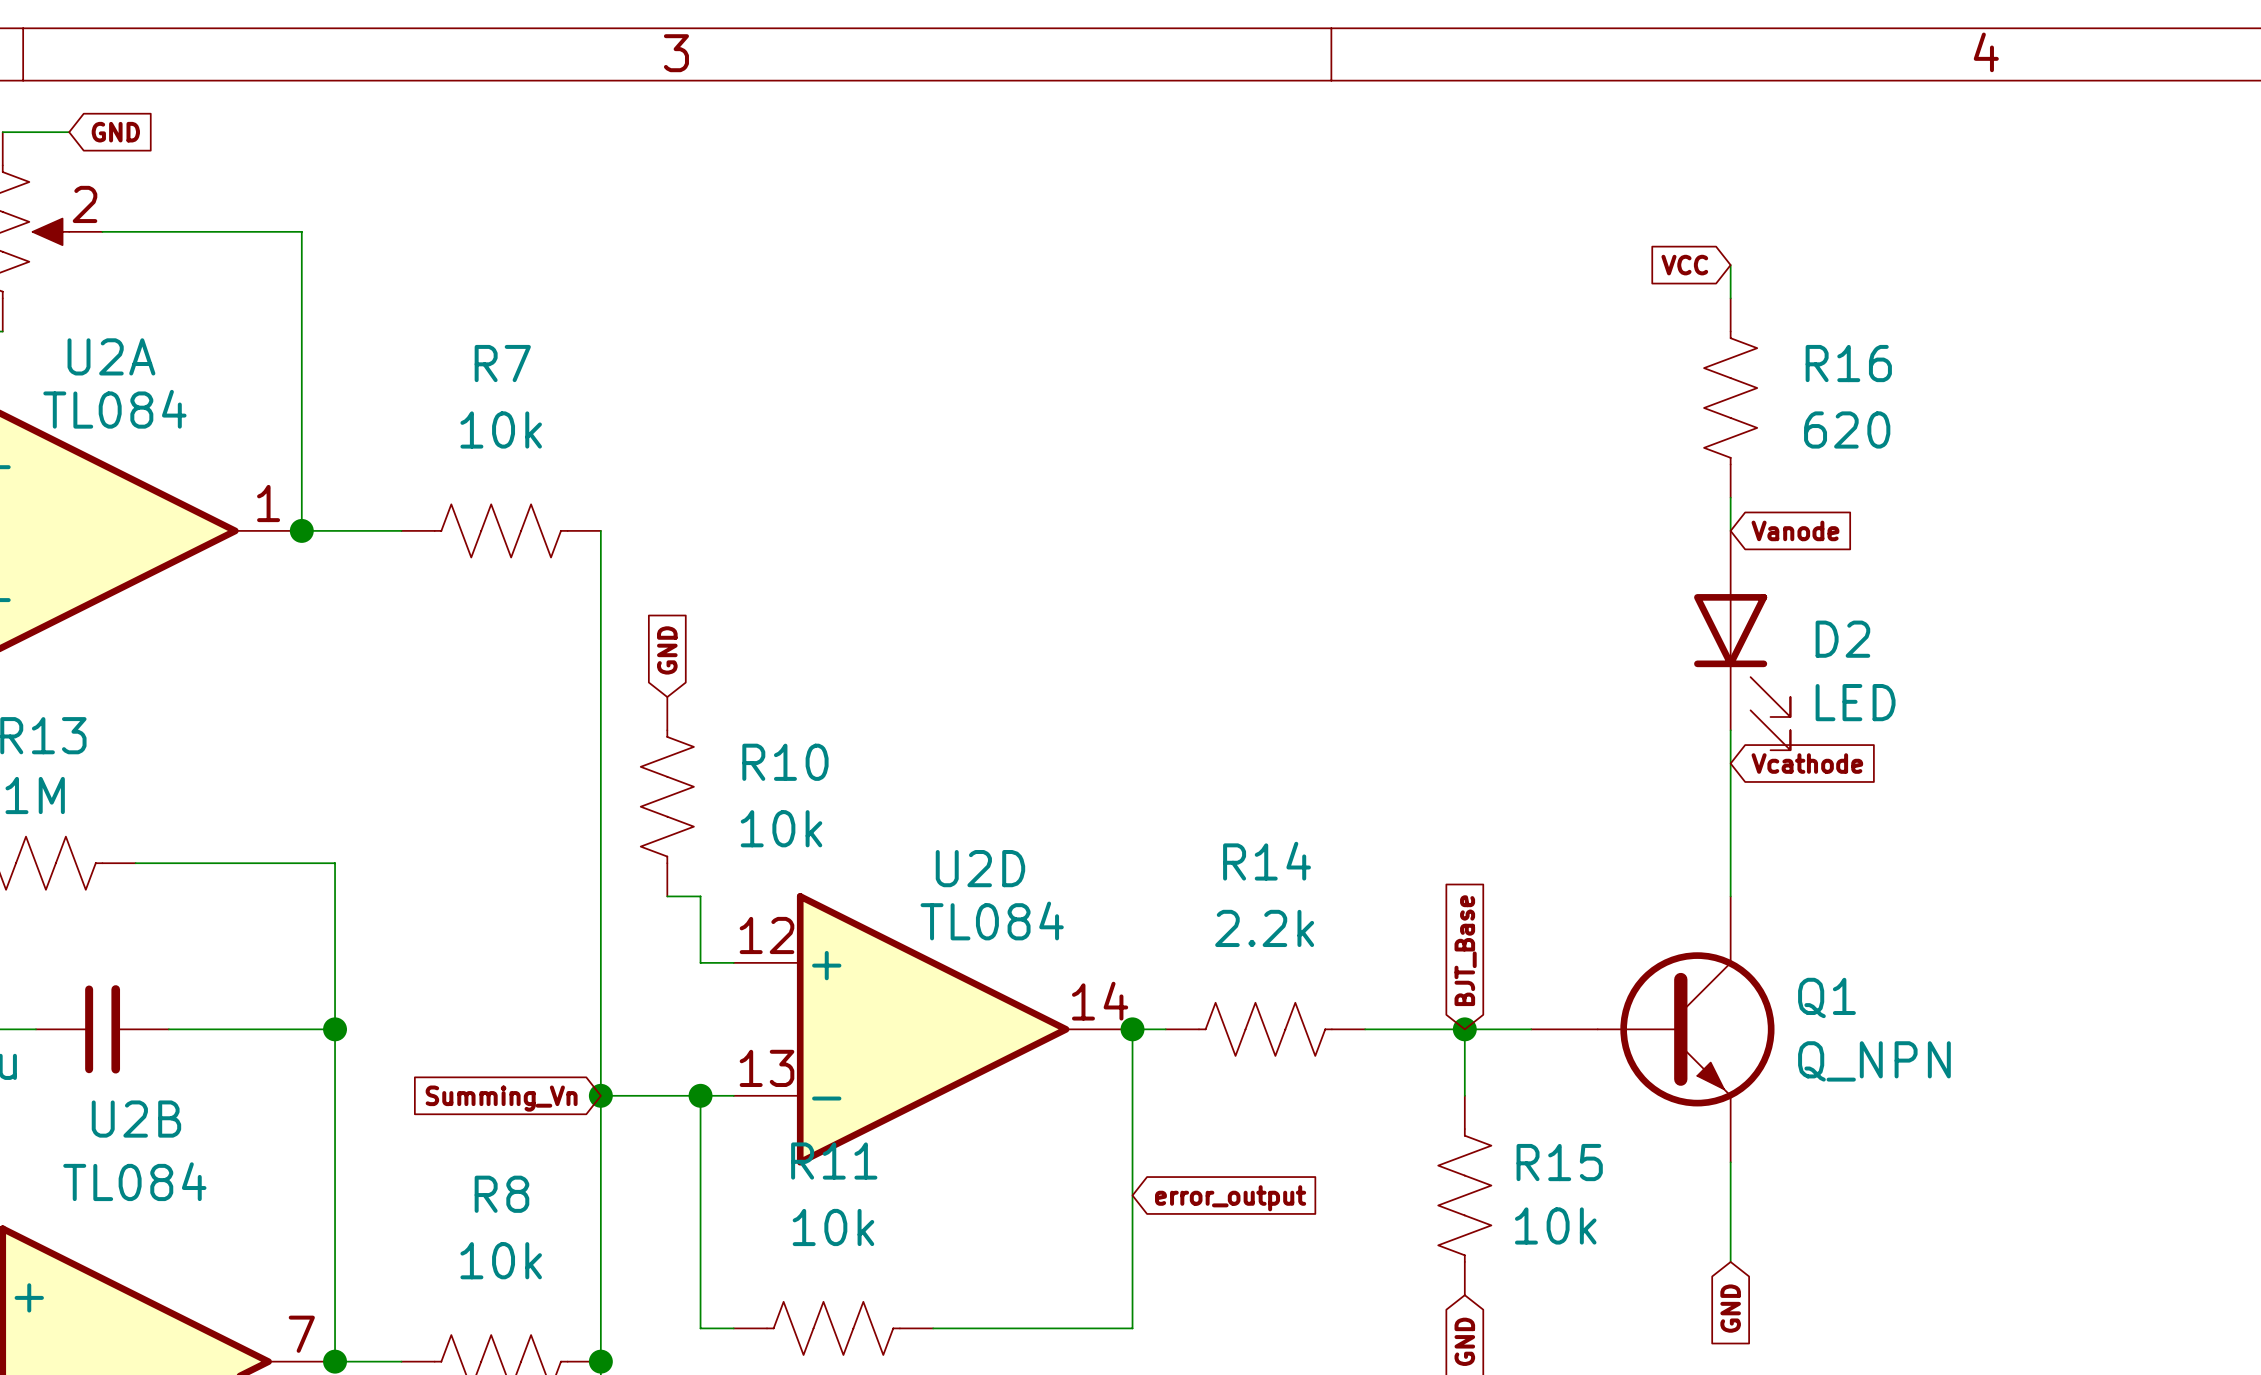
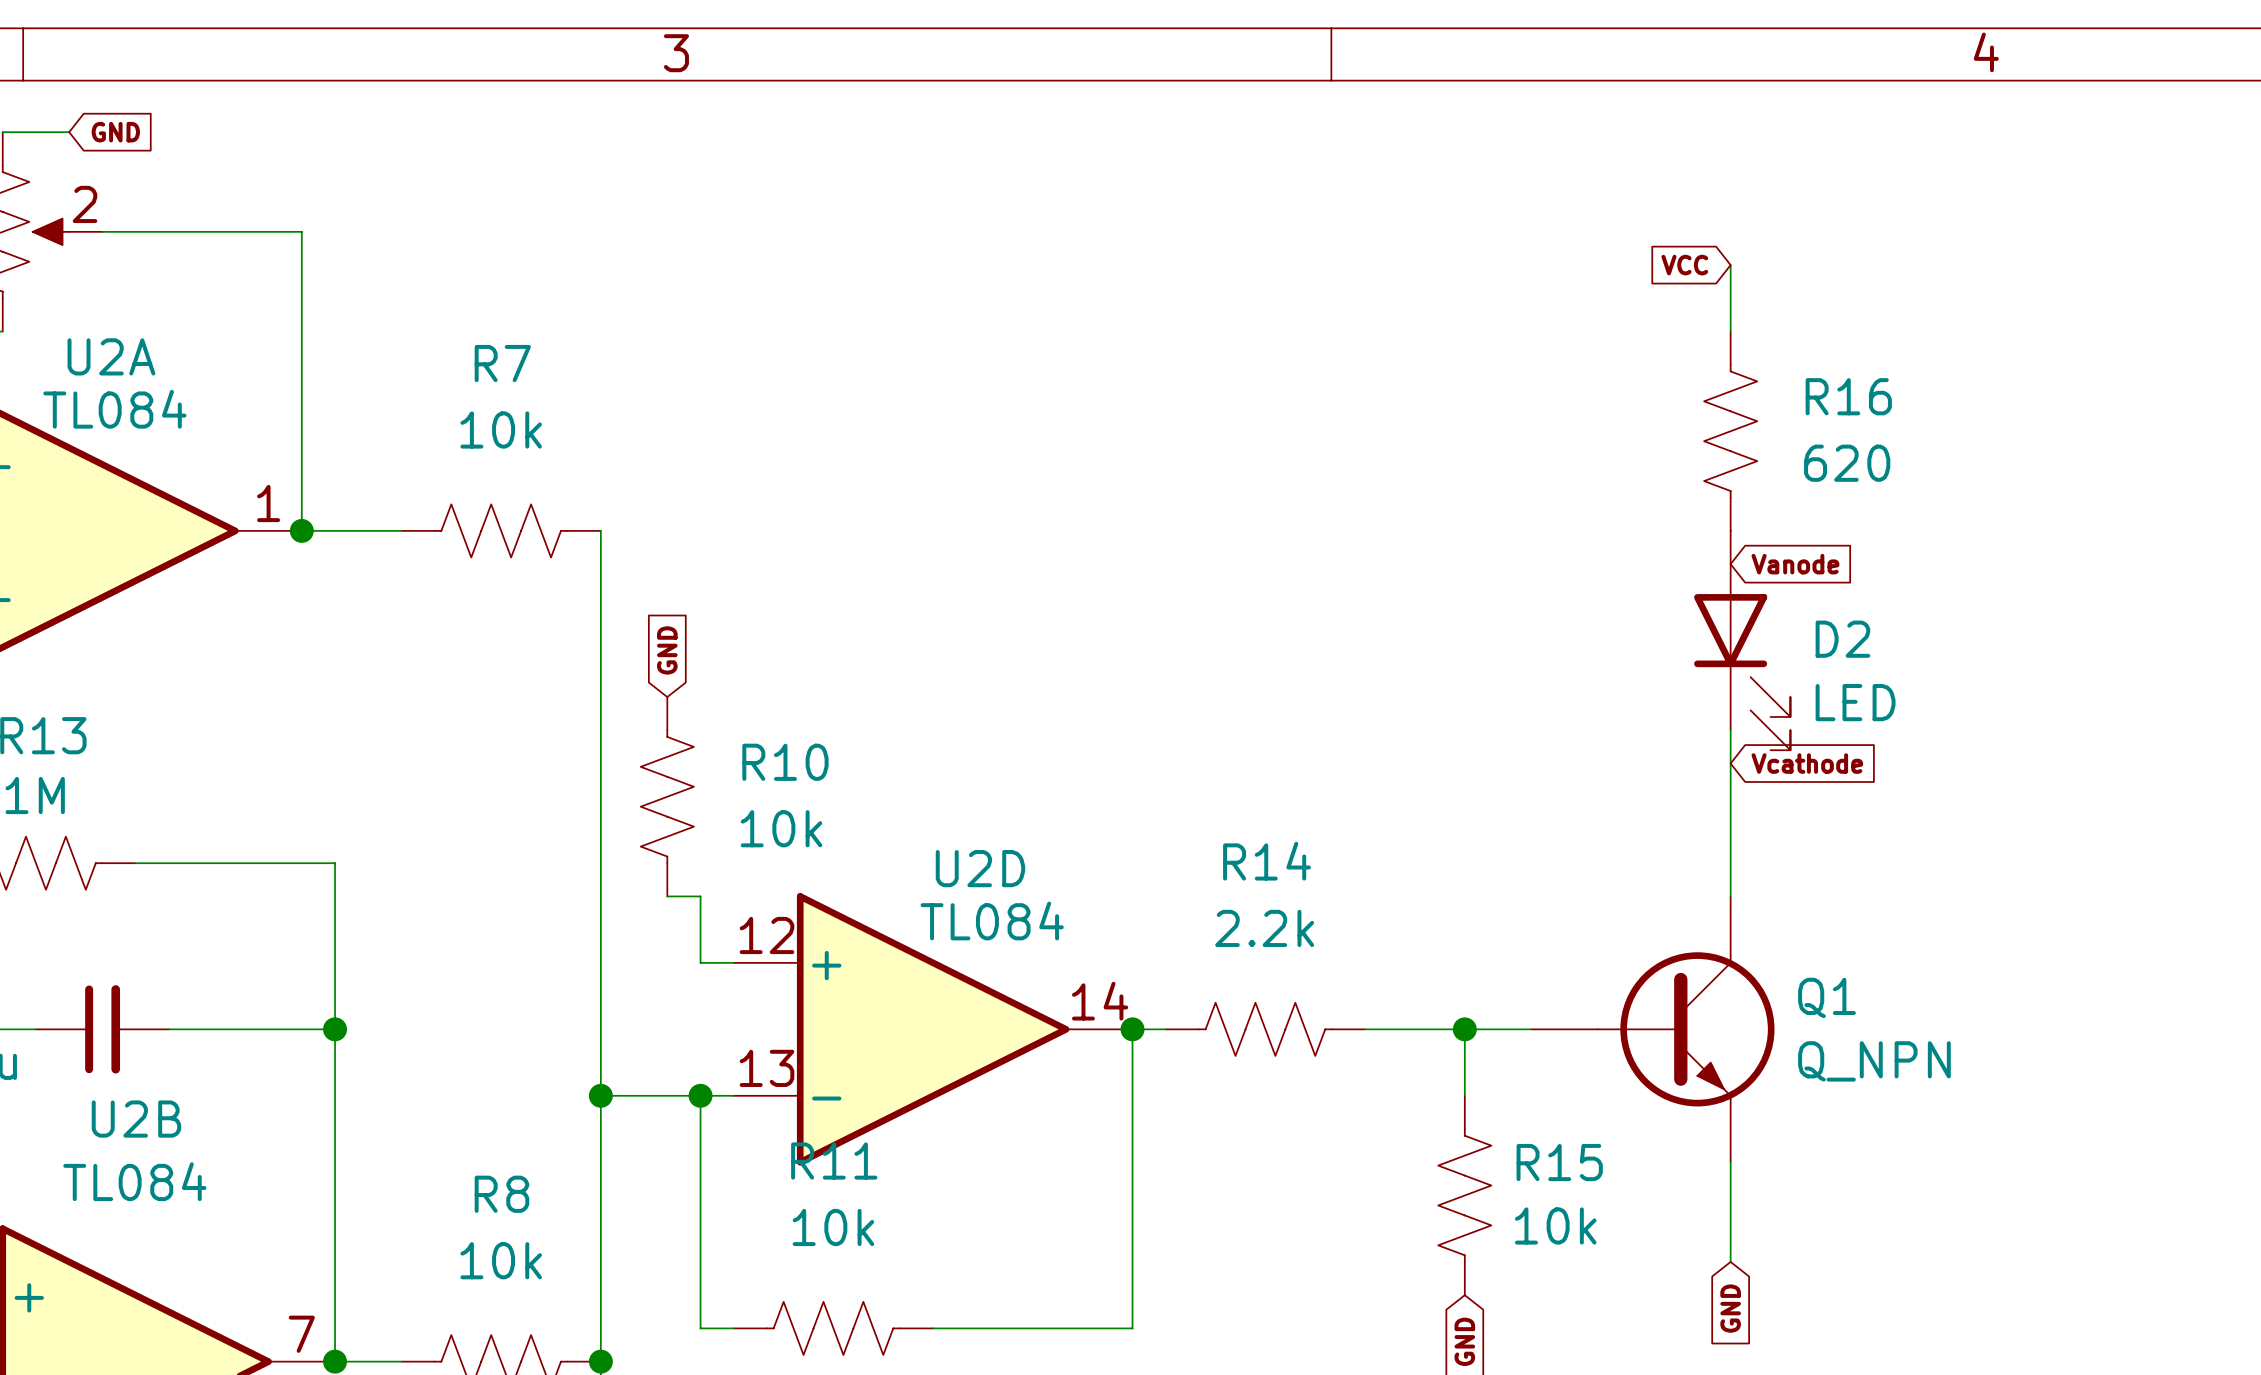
R16 position: (1730, 398) -> (1730, 431)
global label position: Vanode (1795, 530) -> Vanode (1795, 564)
global label: BJT_Base (1465, 950) -> none
global label: Summing_Vn (501, 1098) -> none
global label: error_output (1230, 1198) -> none

